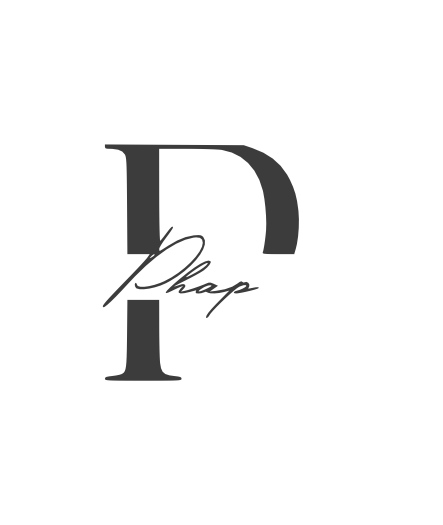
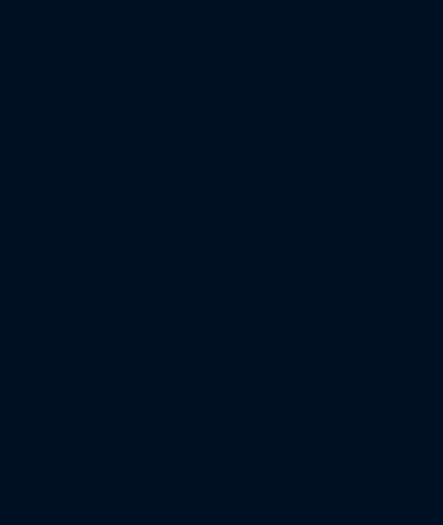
drawing: [102, 144, 299, 381] -> none

